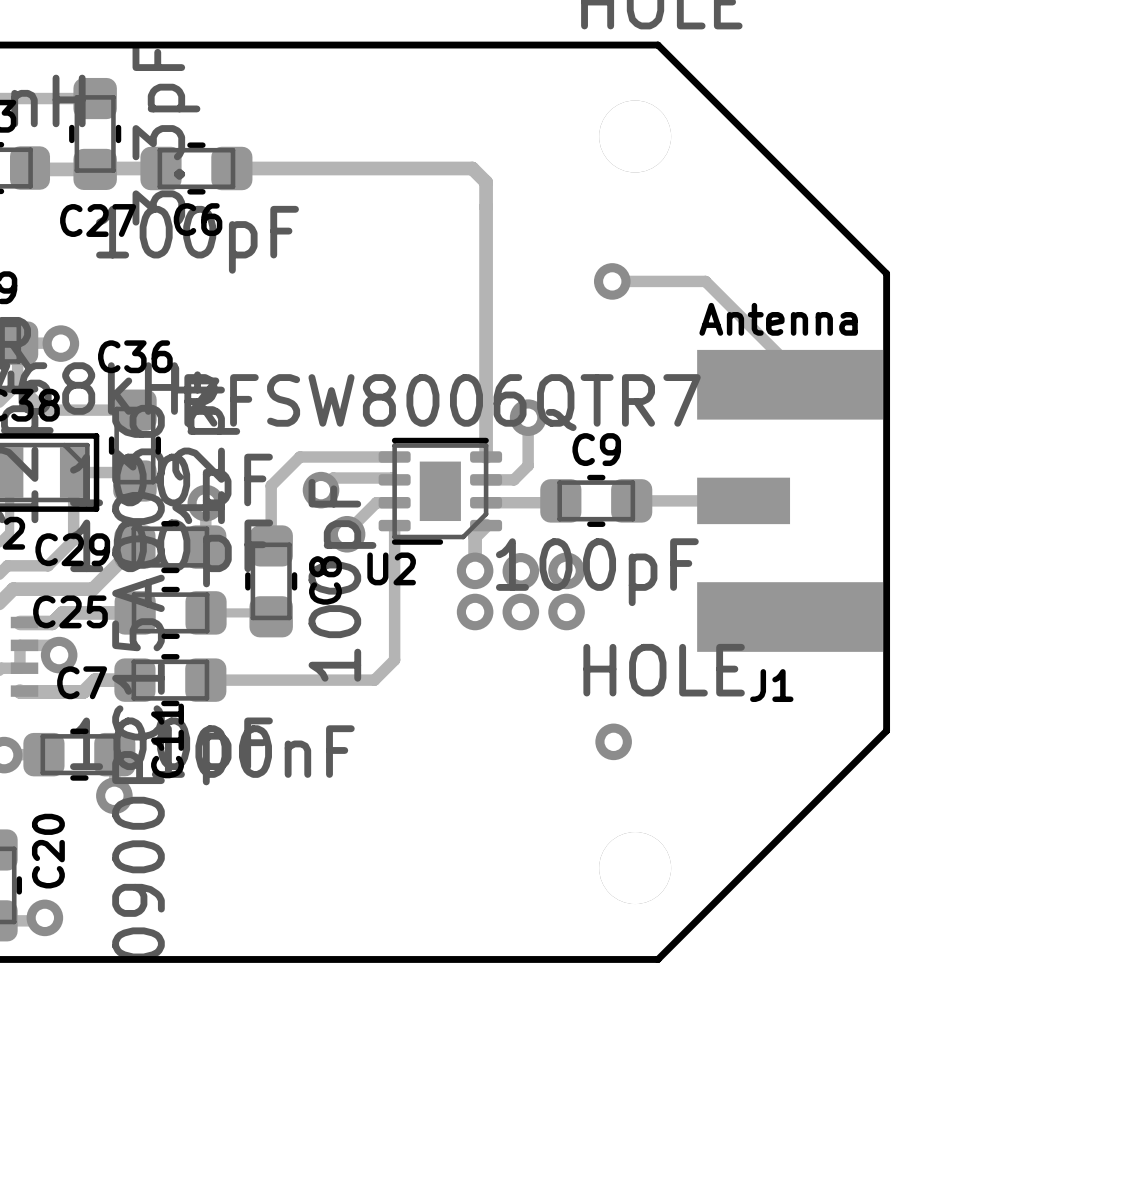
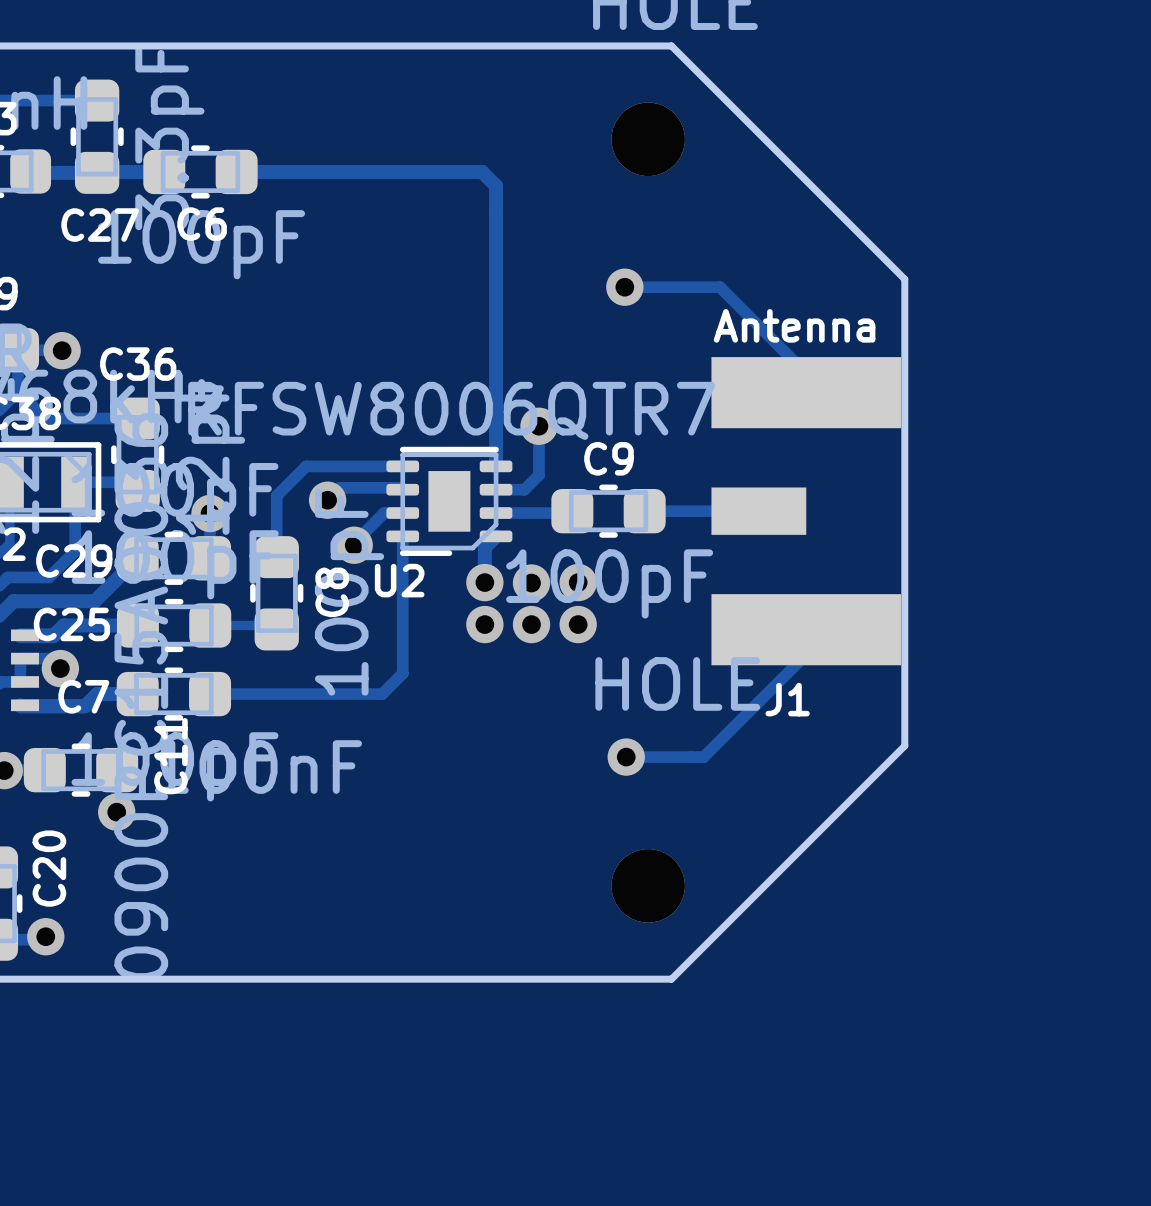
track: none -> (806, 629) (806, 654) (703, 757) (626, 757)

